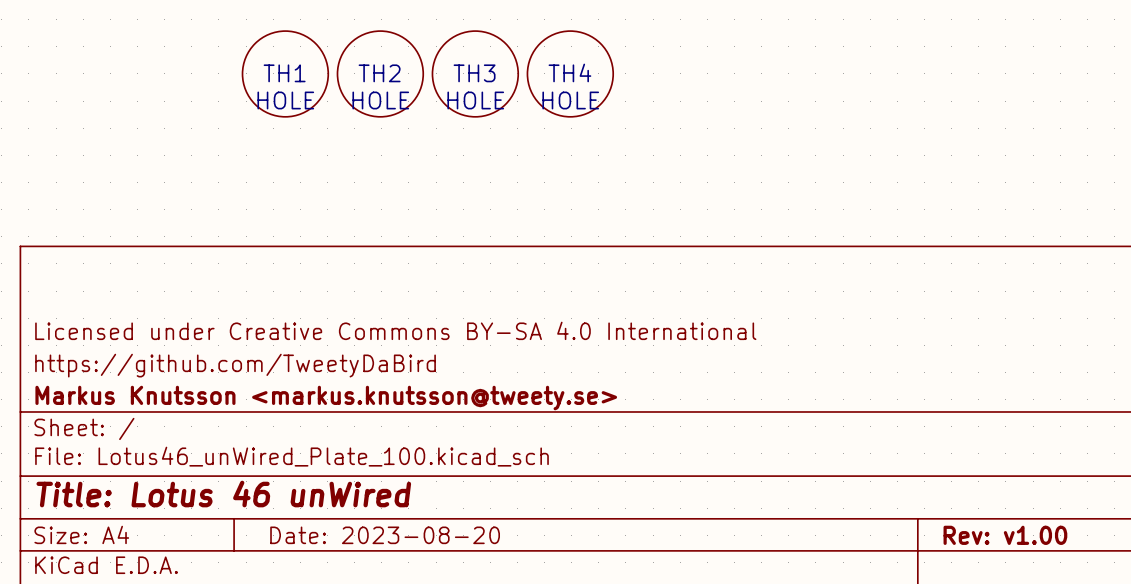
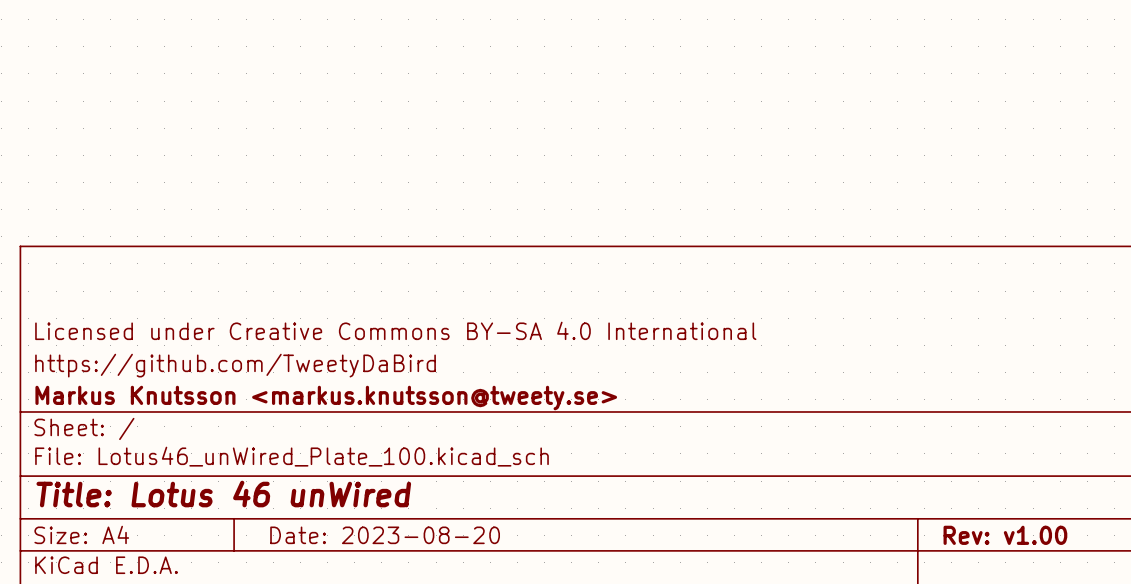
TH1: HOLE (285, 73) -> none
TH2: HOLE (380, 73) -> none
TH3: HOLE (475, 73) -> none
TH4: HOLE (570, 73) -> none

